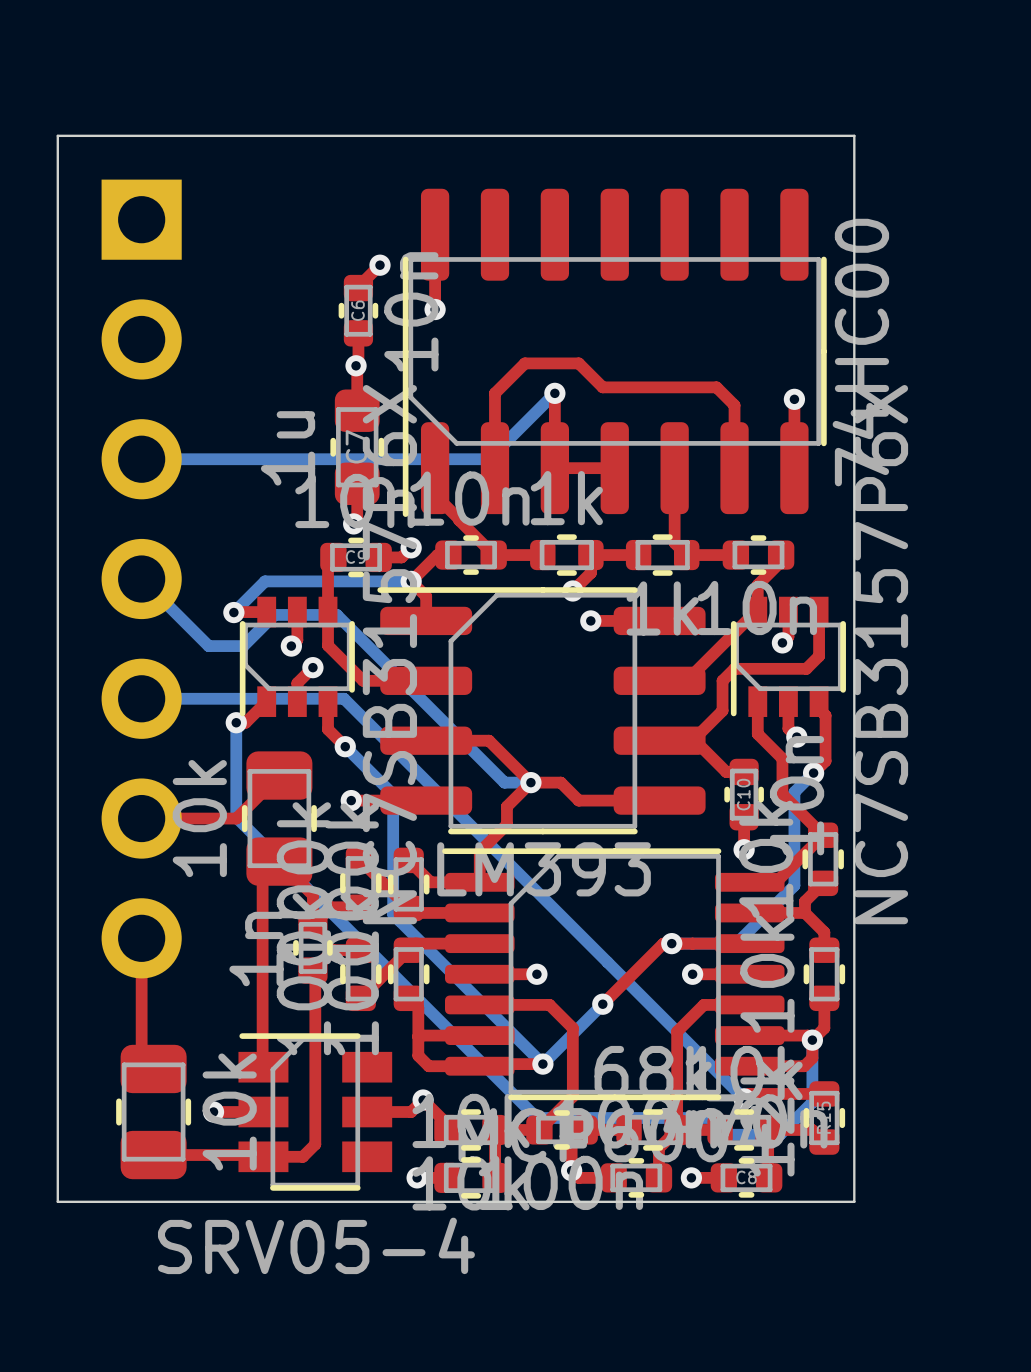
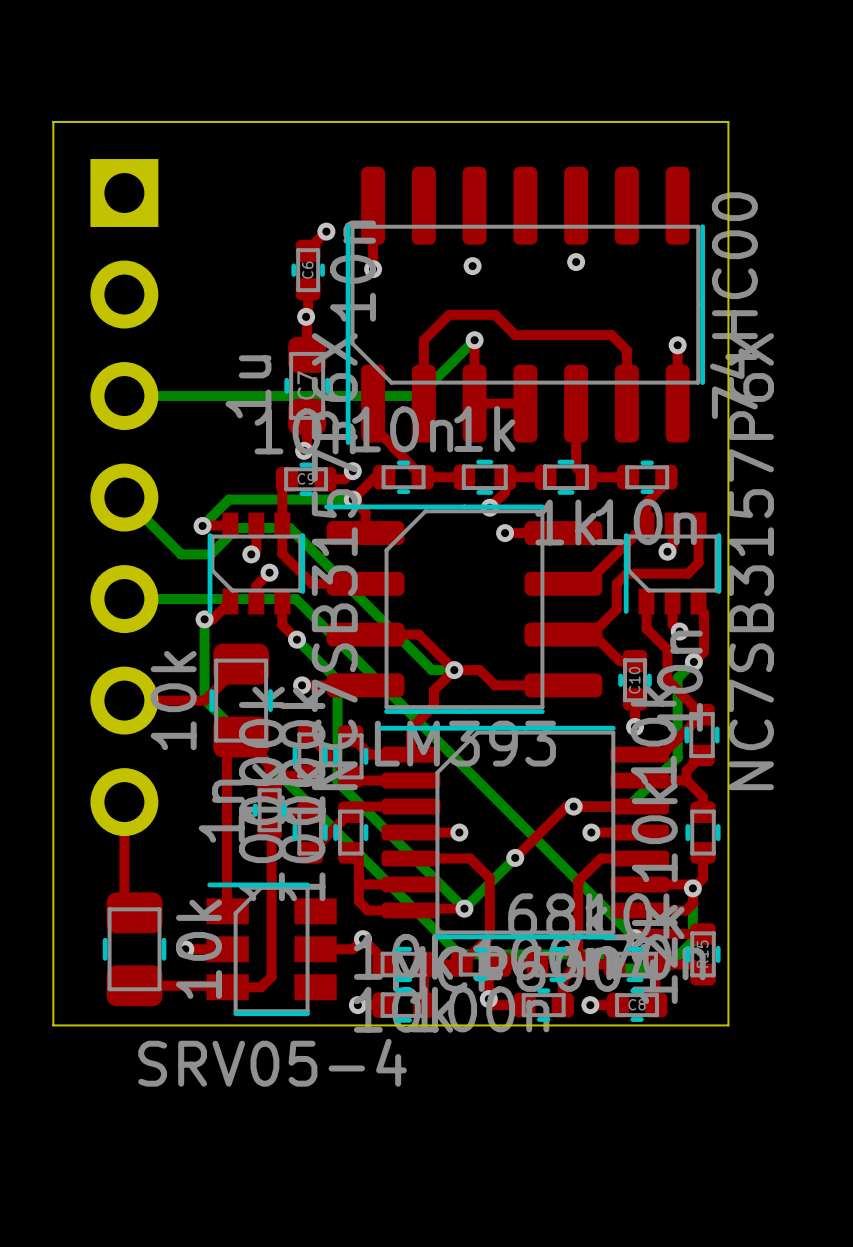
via: none -> (576, 262)
via: none -> (472, 266)

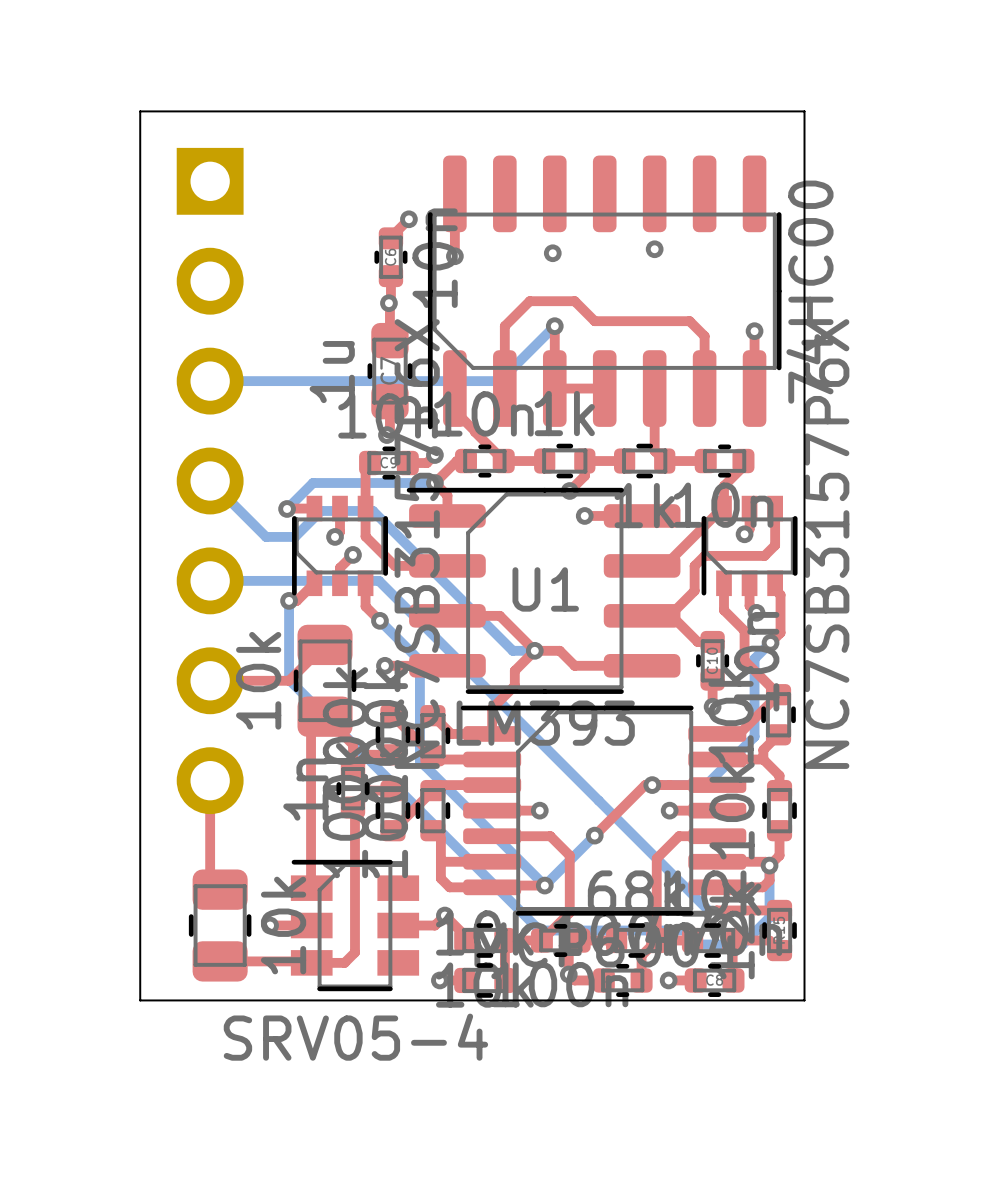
U1 name: none -> U1 (545, 589)

